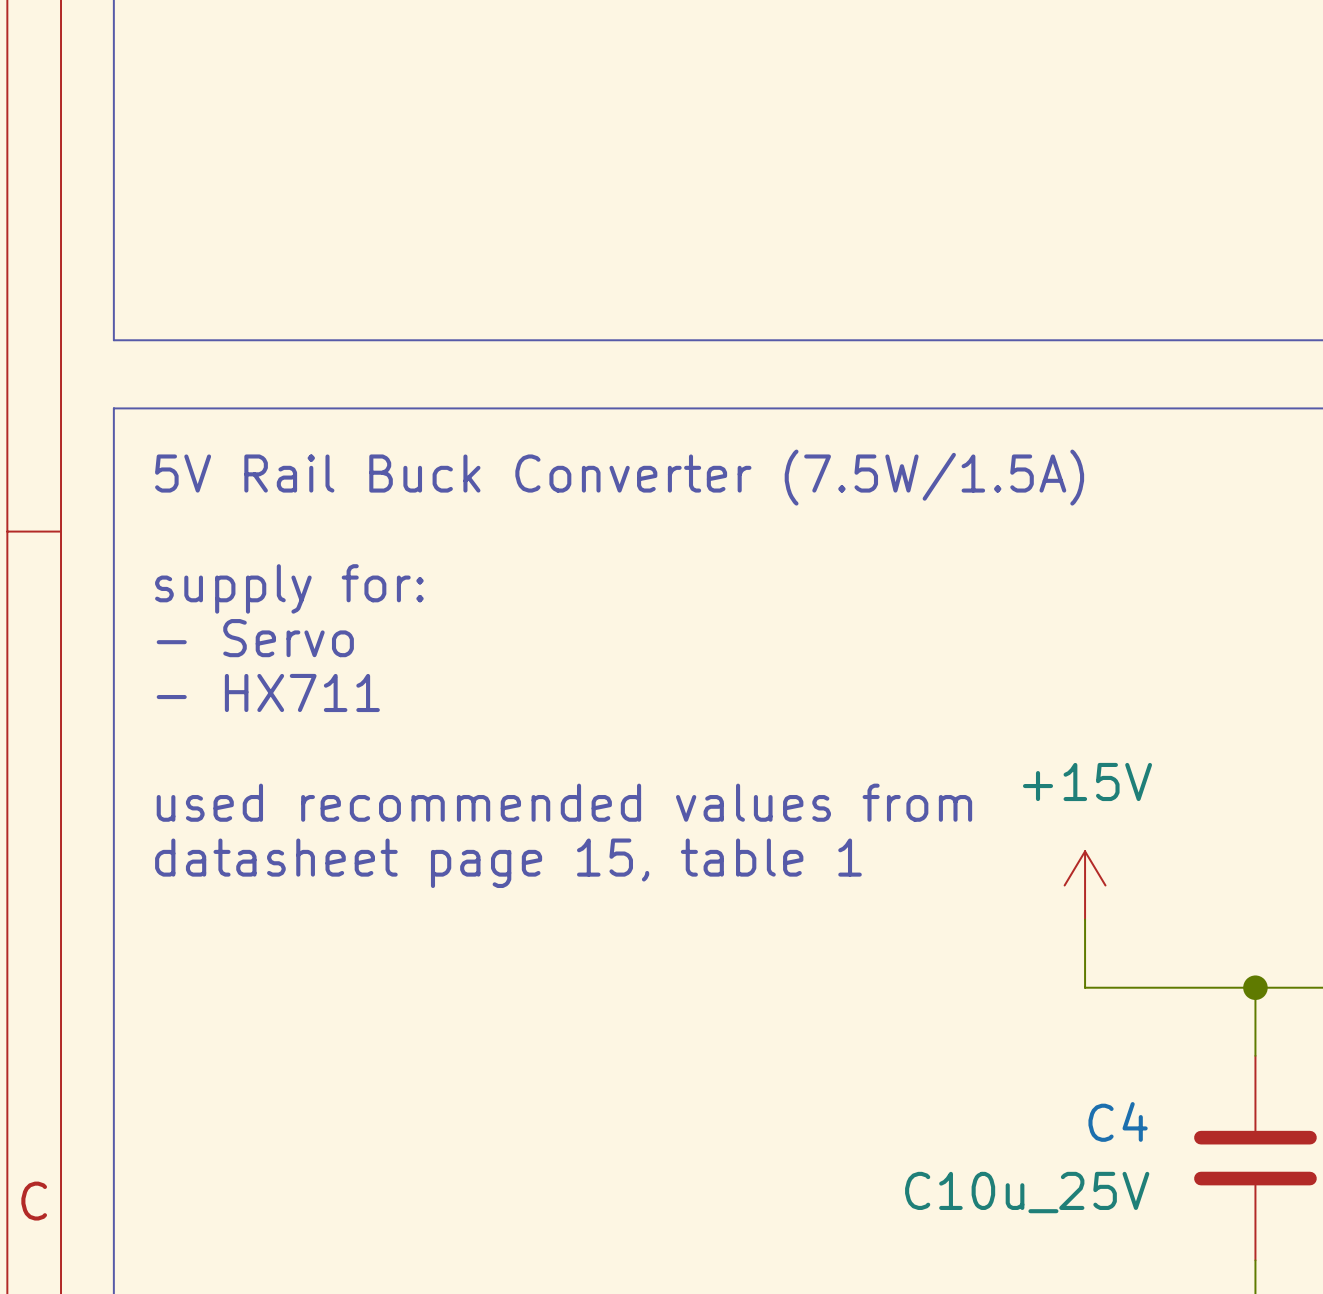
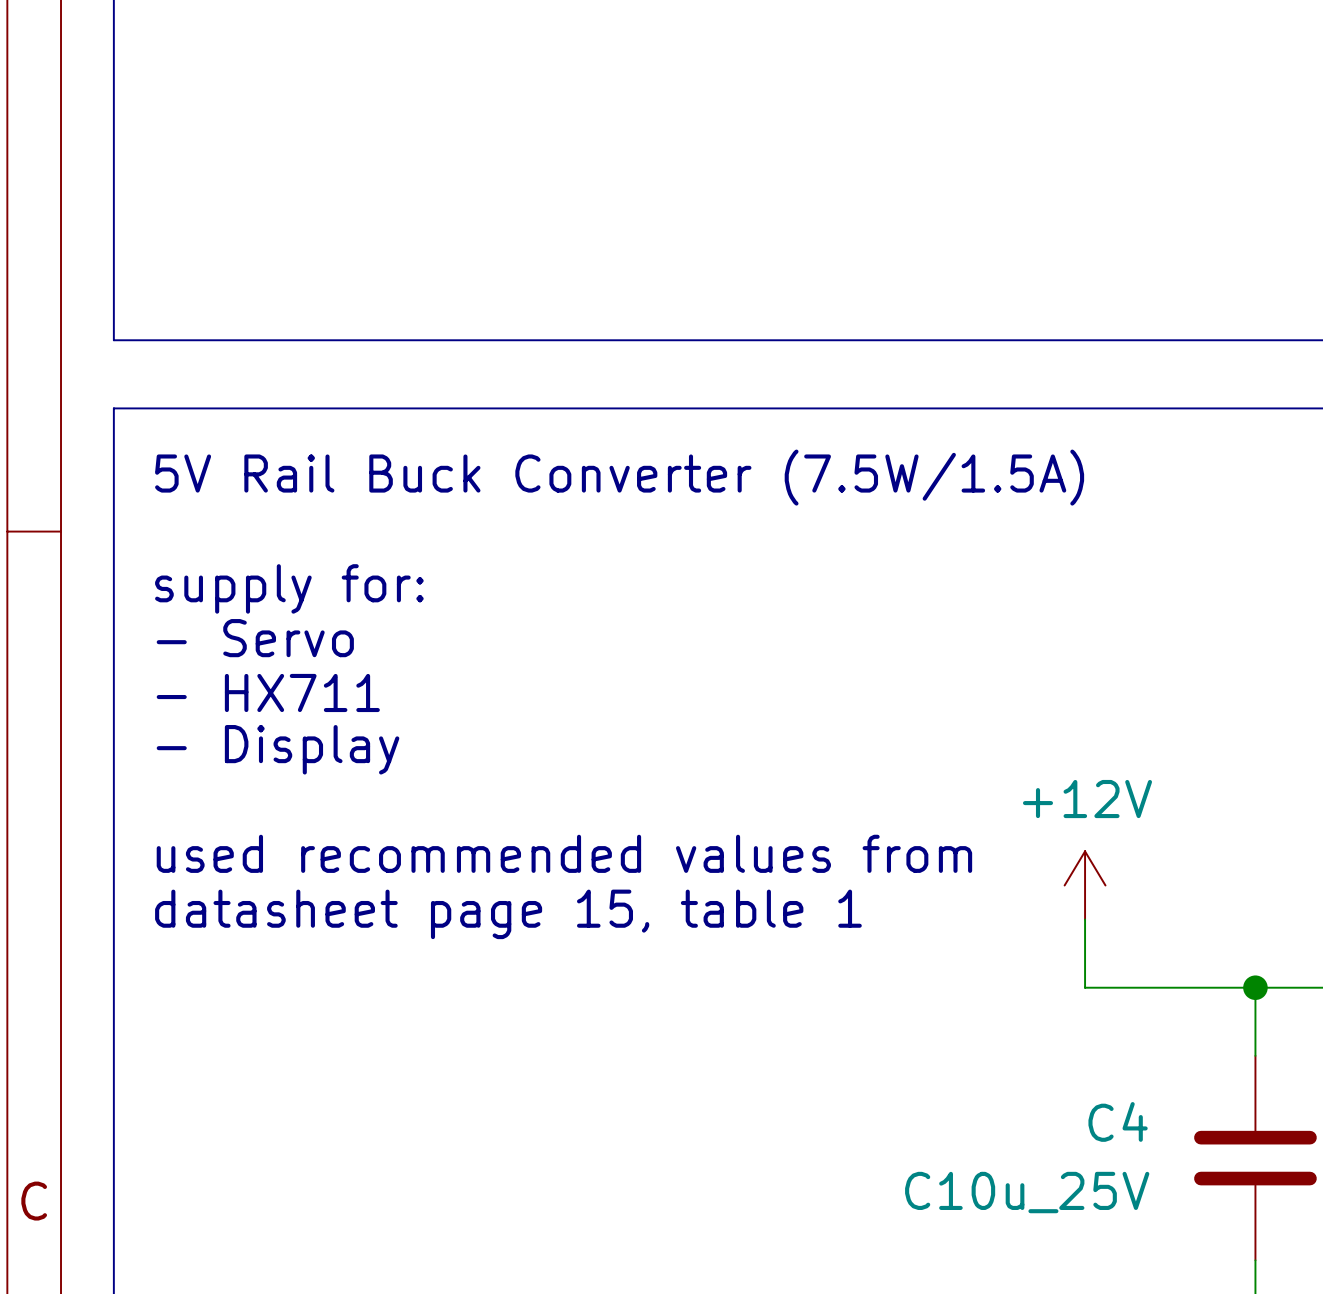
text: none -> - Display (278, 749)
text position: used recommended values from (564, 802) -> used recommended values from (564, 853)
text position: datasheet page 15, table 1 (508, 863) -> datasheet page 15, table 1 (508, 914)
power symbol: +15V (1085, 885) -> +12V (1085, 885)

